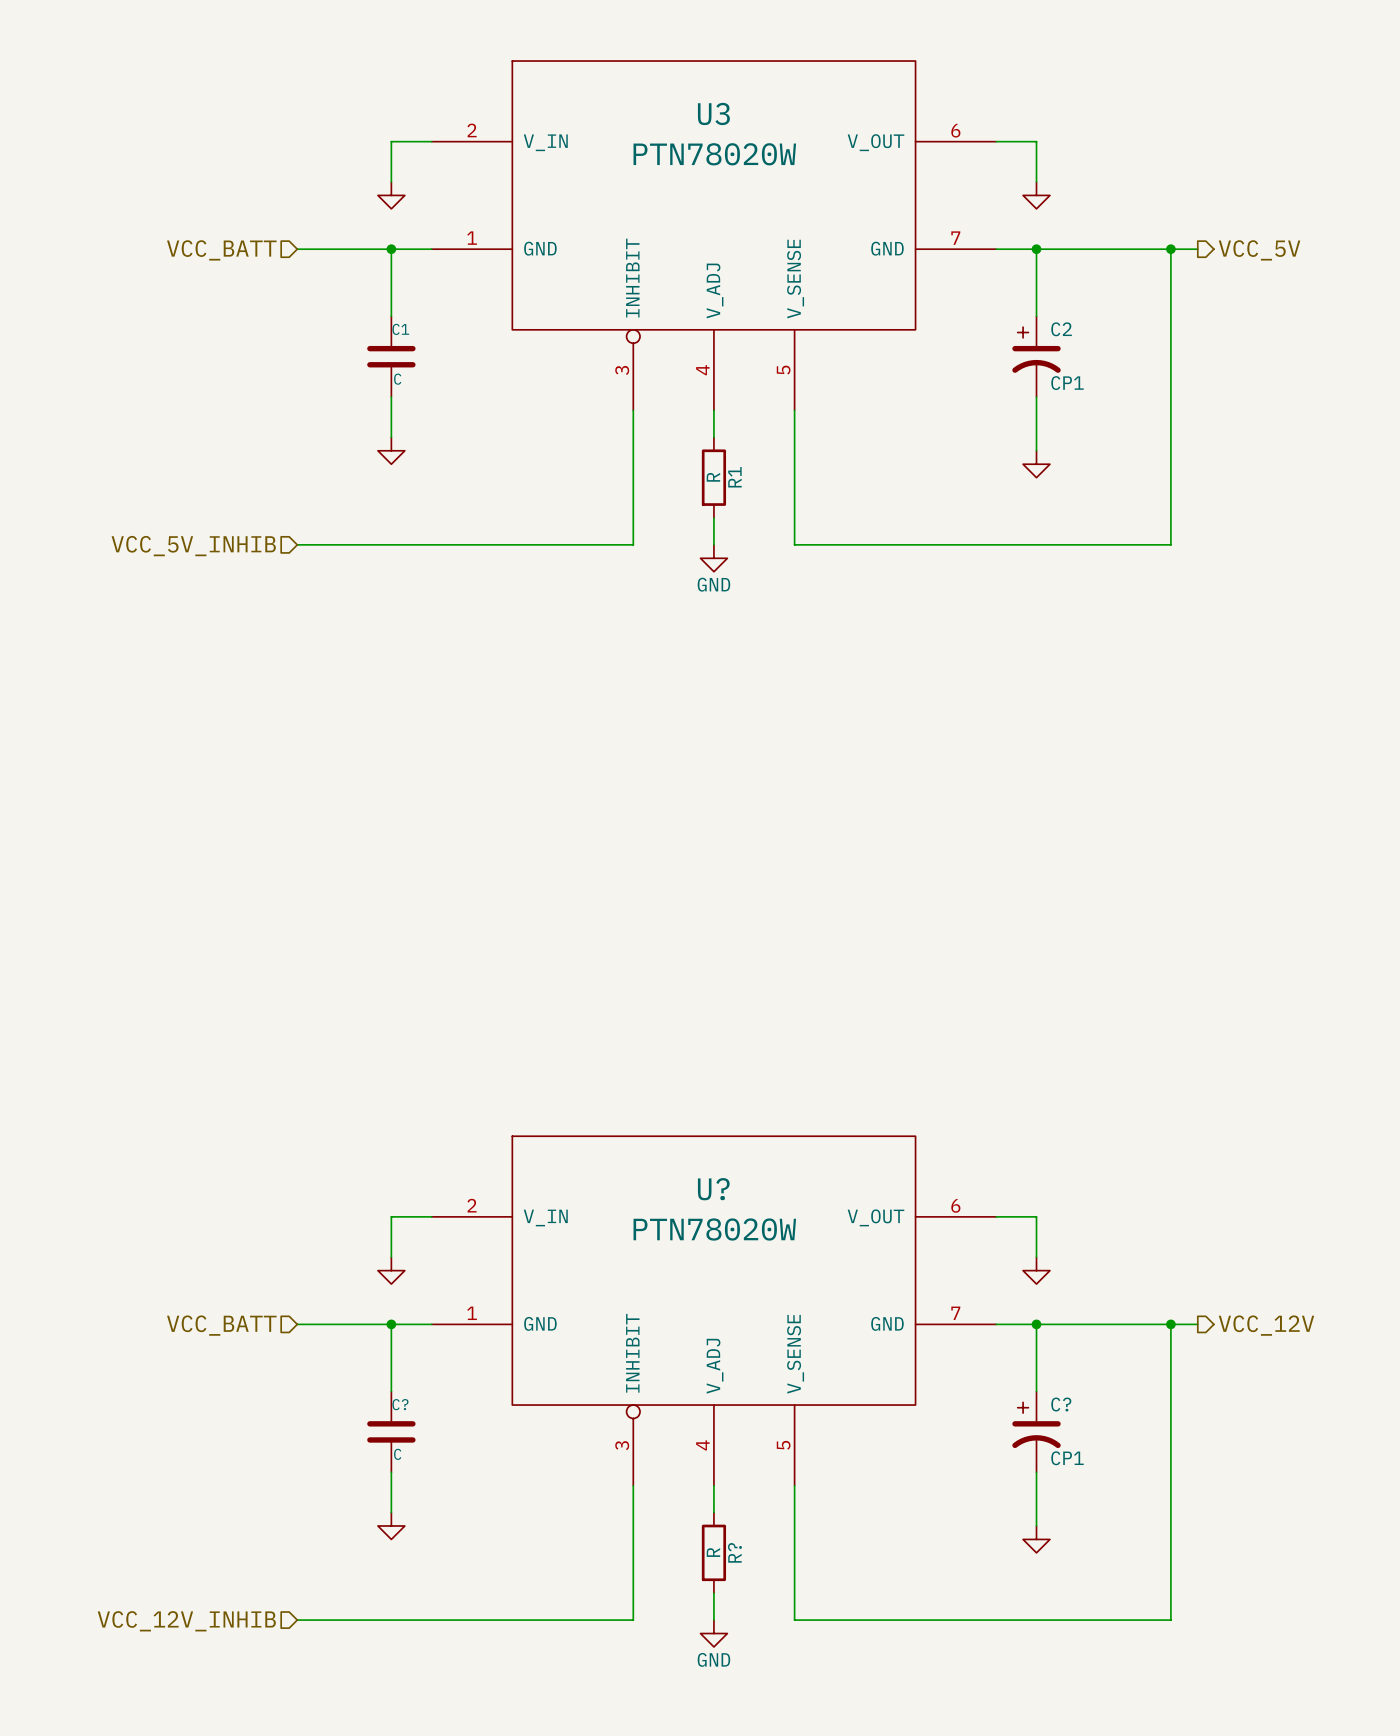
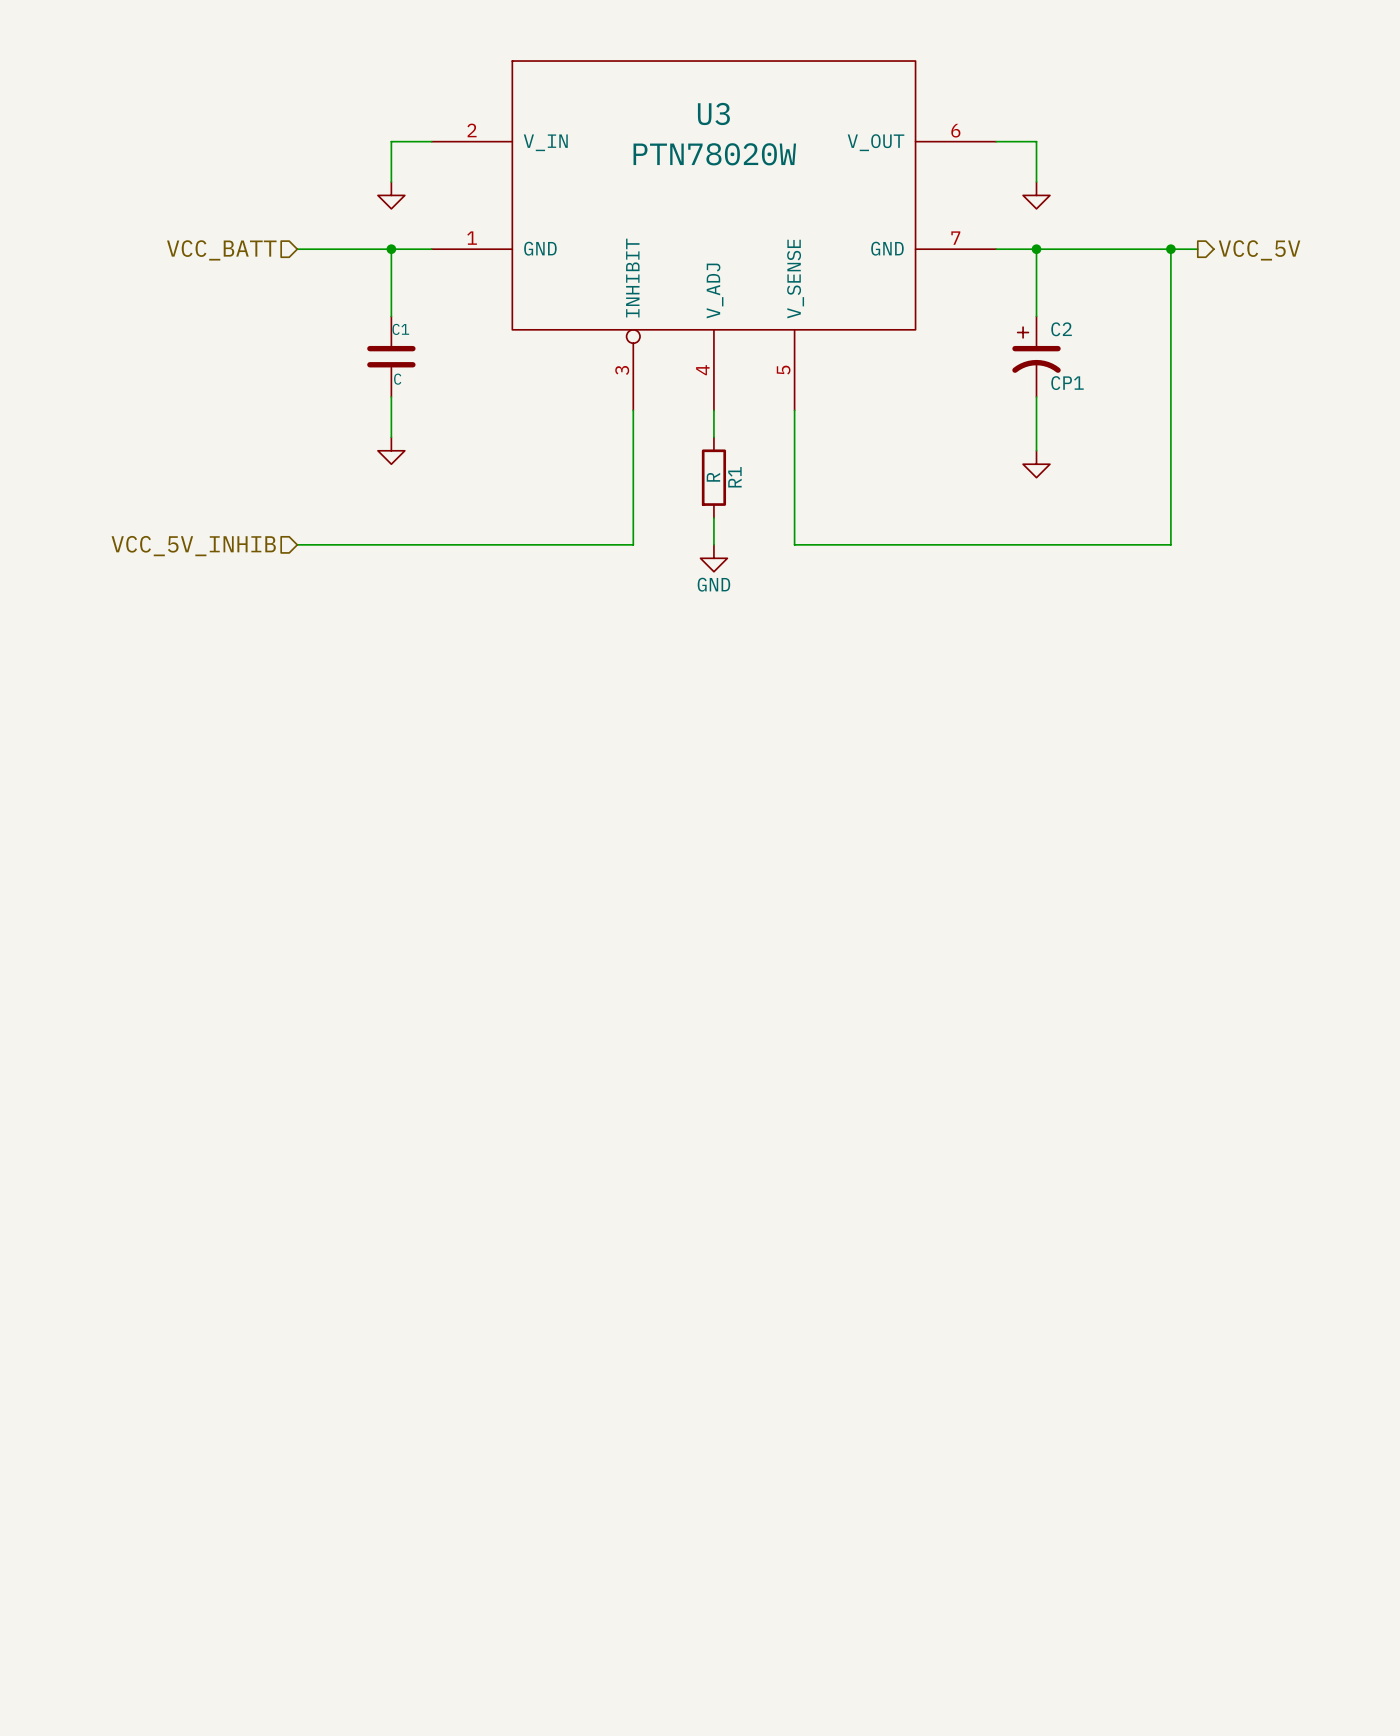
wire: (431, 1216) (391, 1216) (391, 1257) -> none
wire: (996, 1216) (1036, 1216) (1036, 1257) -> none
power symbol: (391, 1270) -> none
power symbol: (1036, 1270) -> none
U?: PTN78020W (713, 1310) -> none
wire: (297, 1324) (431, 1324) -> none
wire: (391, 1324) (391, 1391) -> none
junction: (391, 1324) -> none
wire: (996, 1324) (1197, 1324) -> none
wire: (1036, 1324) (1036, 1391) -> none
junction: (1036, 1324) -> none
wire: (1170, 1324) (1170, 1620) (794, 1620) (794, 1485) -> none
junction: (1170, 1324) -> none
hierarchical label: VCC_BATT (221, 1325) -> none
hierarchical label: VCC_12V (1266, 1325) -> none
C?: C (391, 1431) -> none
C?: CP1 (1036, 1431) -> none
wire: (391, 1472) (391, 1512) -> none
wire: (1036, 1472) (1036, 1525) -> none
wire: (633, 1485) (633, 1620) (297, 1620) -> none
wire: (713, 1485) (713, 1512) -> none
power symbol: (391, 1525) -> none
power symbol: (1036, 1539) -> none
R?: R (713, 1552) -> none
wire: (713, 1593) (713, 1620) -> none
hierarchical label: VCC_12V_INHIB (186, 1621) -> none
power symbol: GND (713, 1633) -> none

